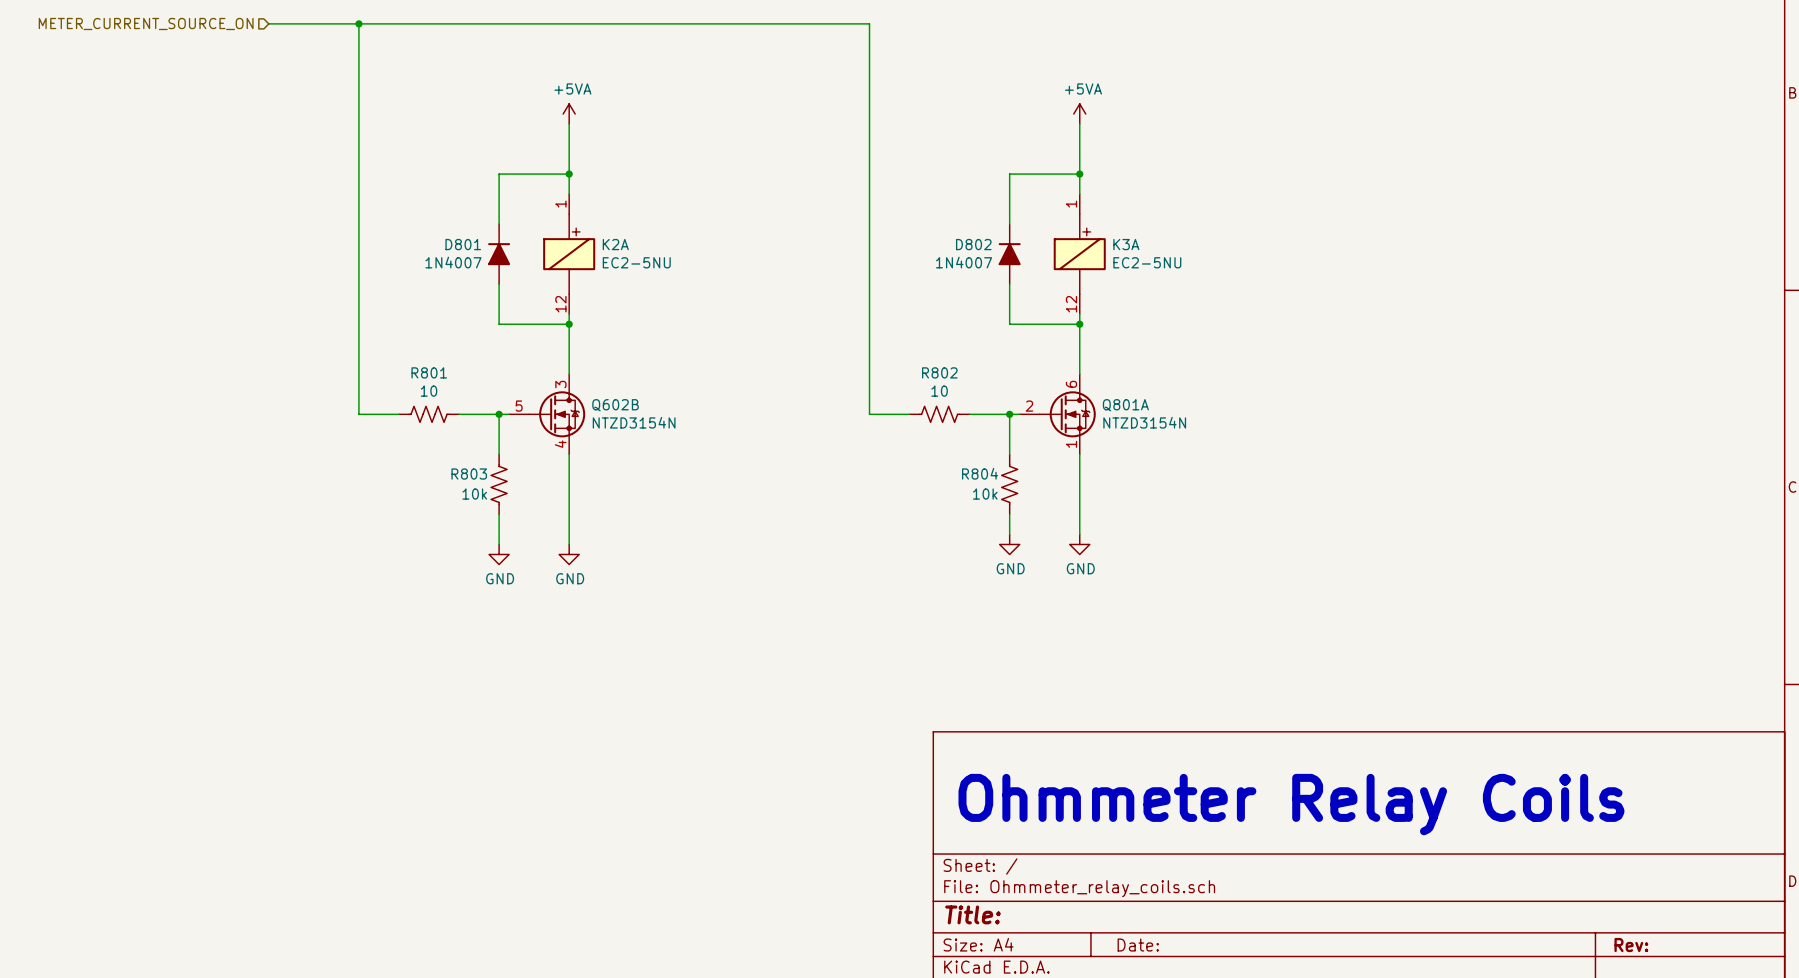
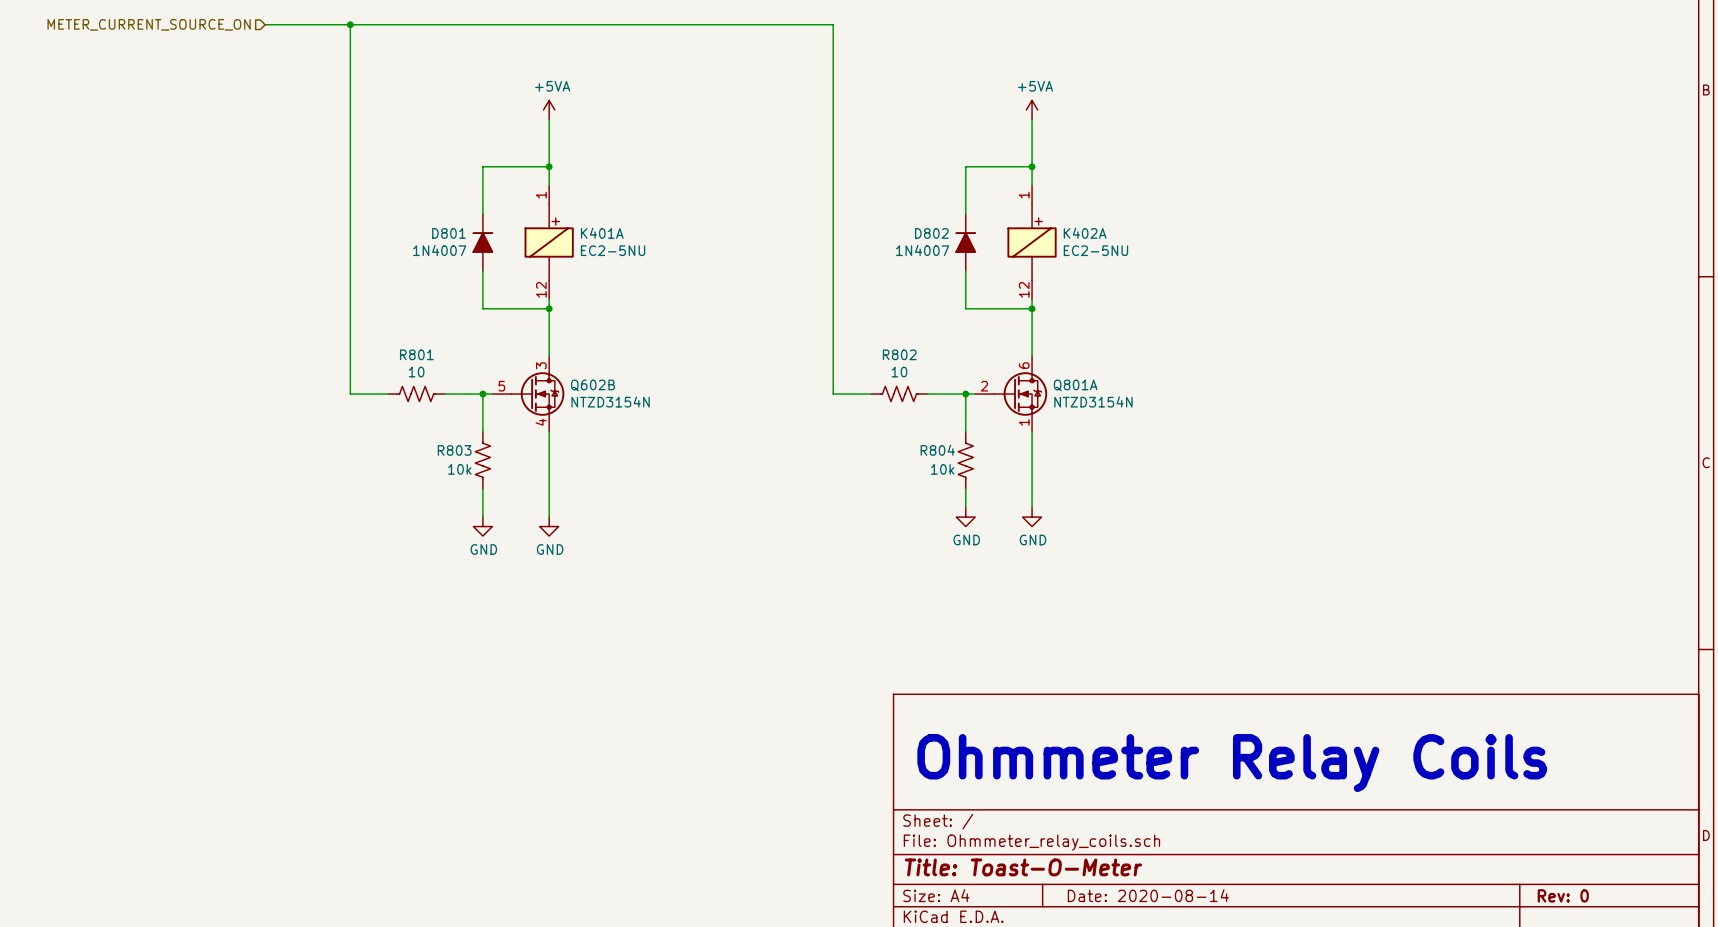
K2A name: K2A (615, 244) -> K401A (602, 233)
K3A name: K3A (1126, 244) -> K402A (1085, 233)
title block: Title: (972, 914) -> Title: Toast-O-Meter (1023, 867)
title block: Date: (1138, 945) -> Date: 2020-08-14 (1148, 895)
title block: Rev: (1631, 945) -> Rev: 0 (1563, 895)

